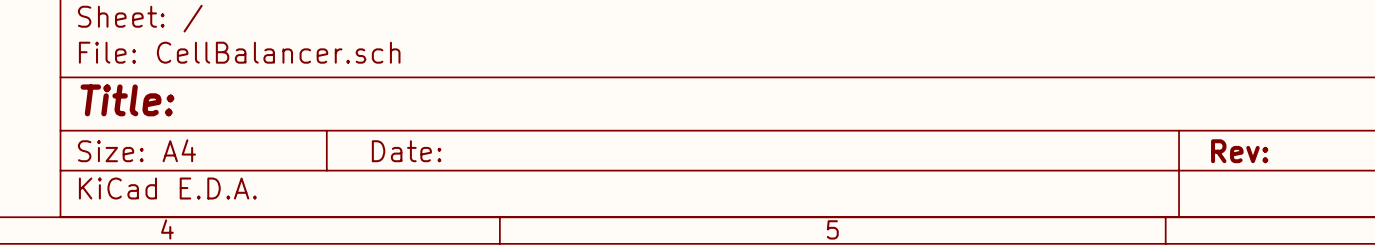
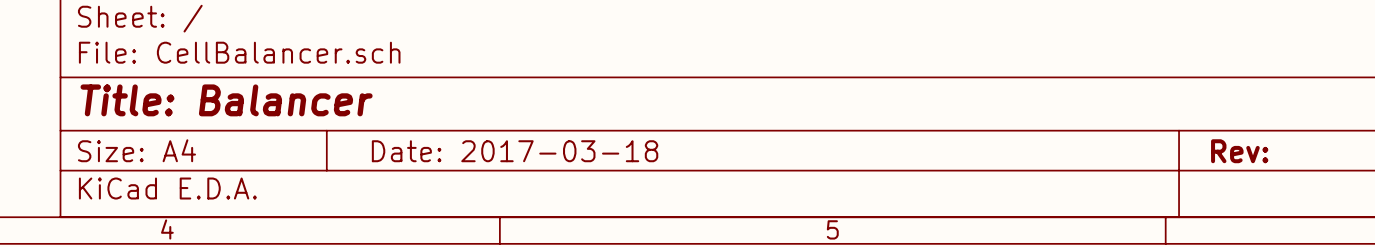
title block: Title: (127, 100) -> Title: Balancer (226, 100)
title block: Date: (406, 151) -> Date: 2017-03-18 (515, 151)

